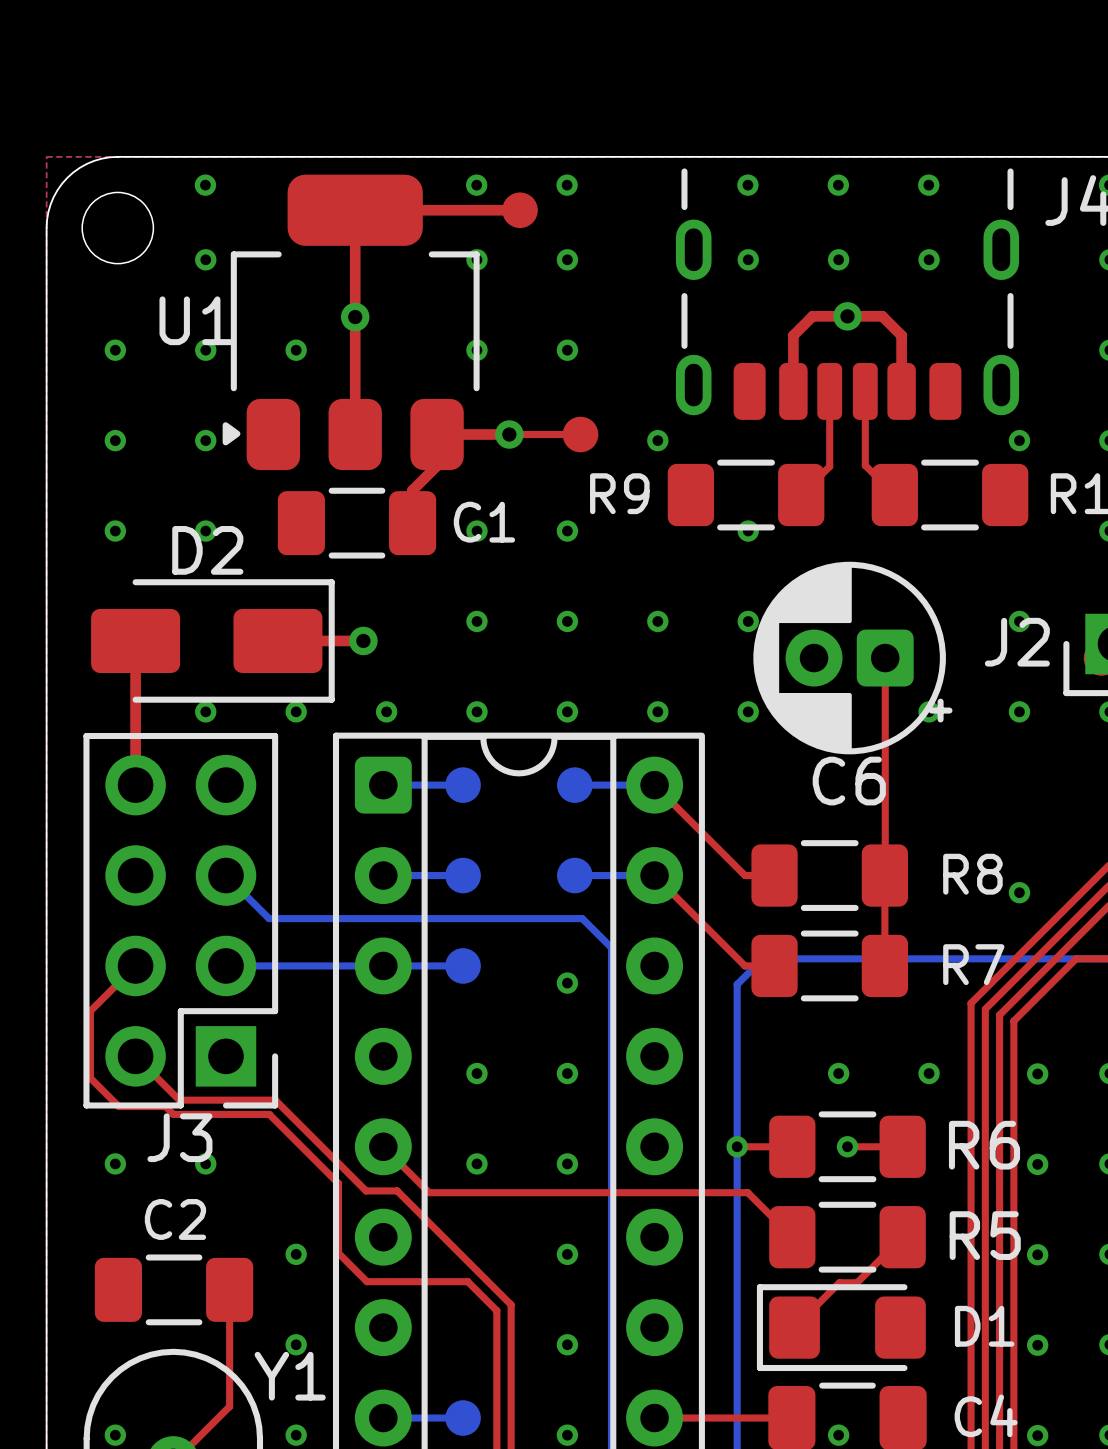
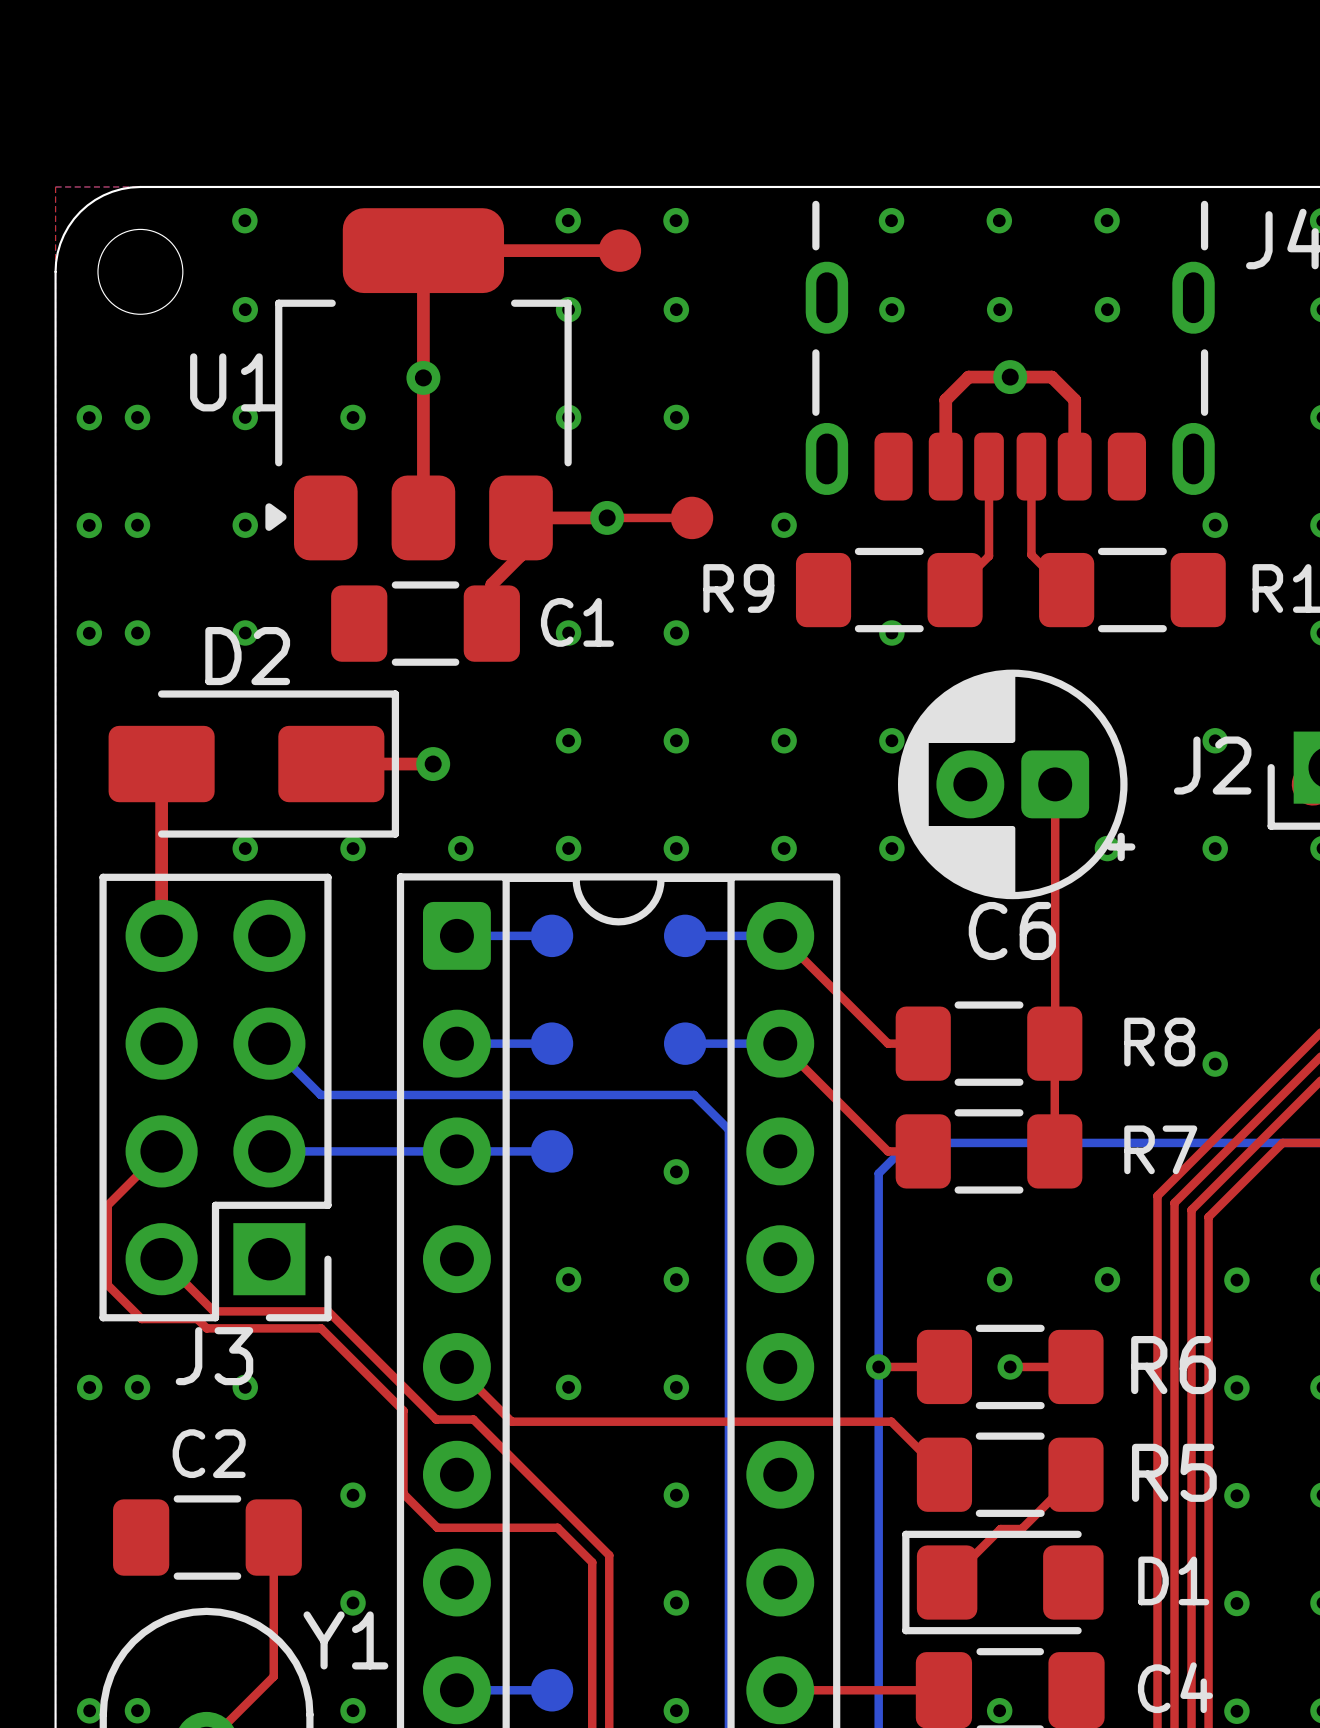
via: none -> (89, 417)
via: none -> (89, 525)
via: none -> (89, 633)
via: none -> (89, 1387)
via: none -> (89, 1710)

